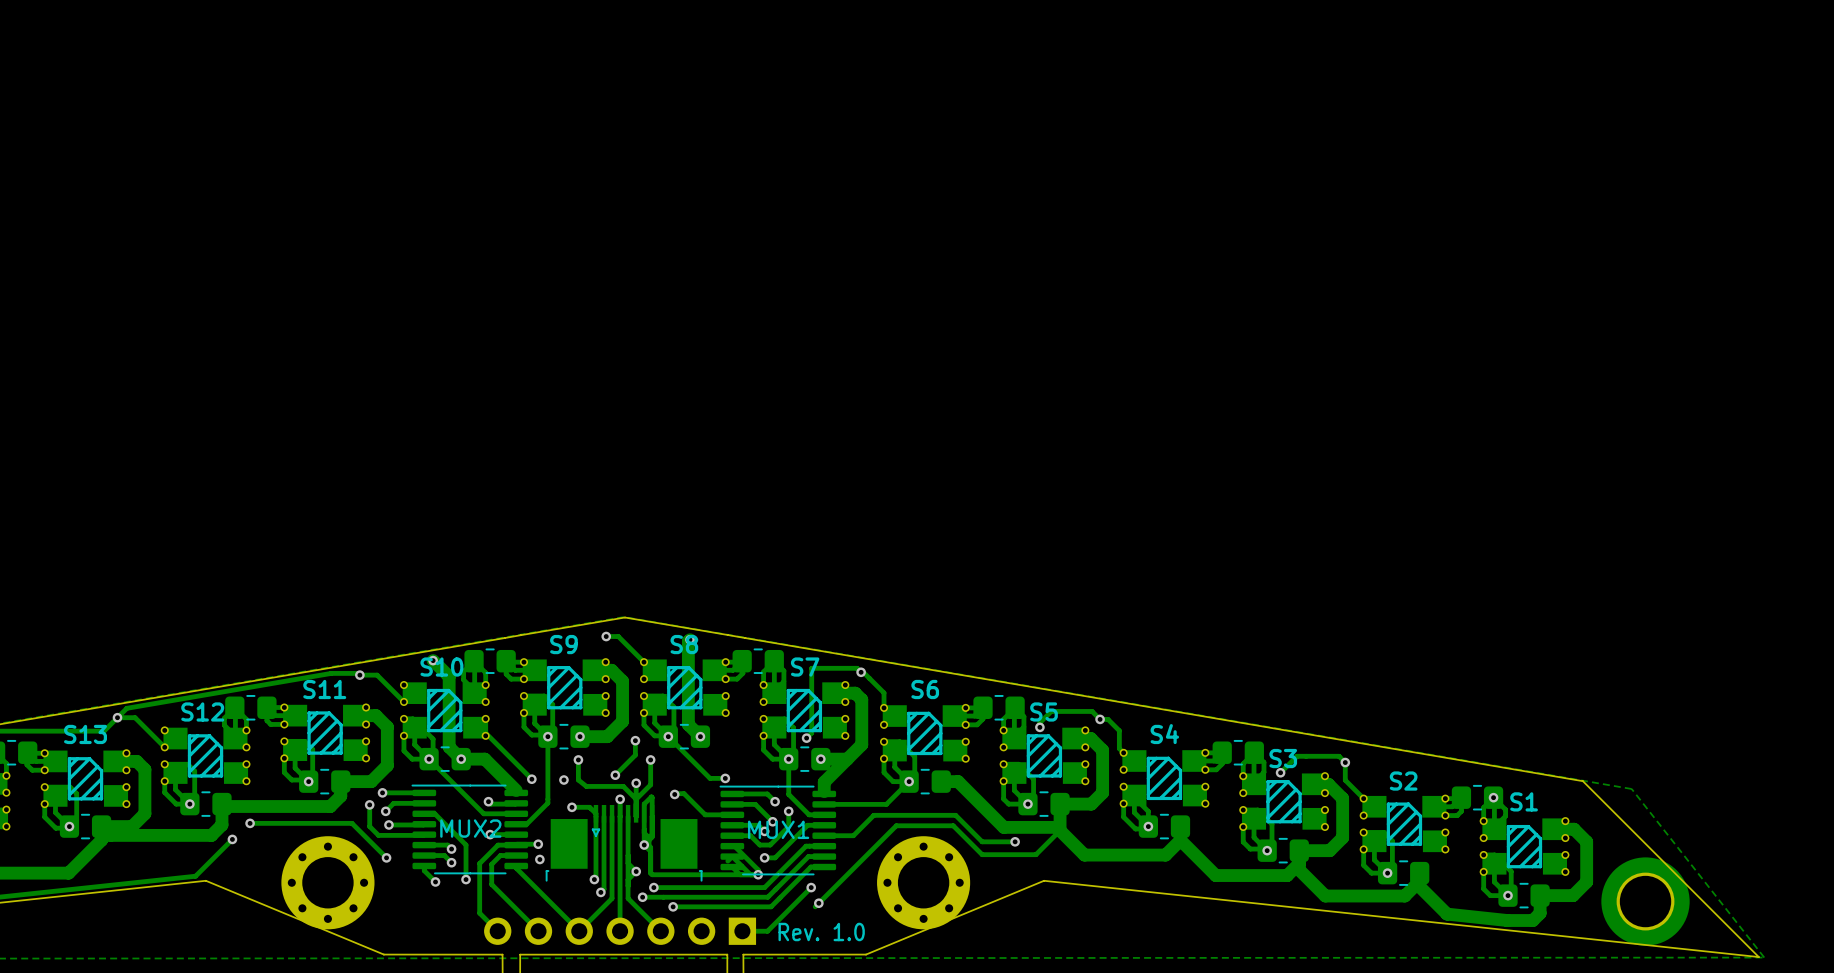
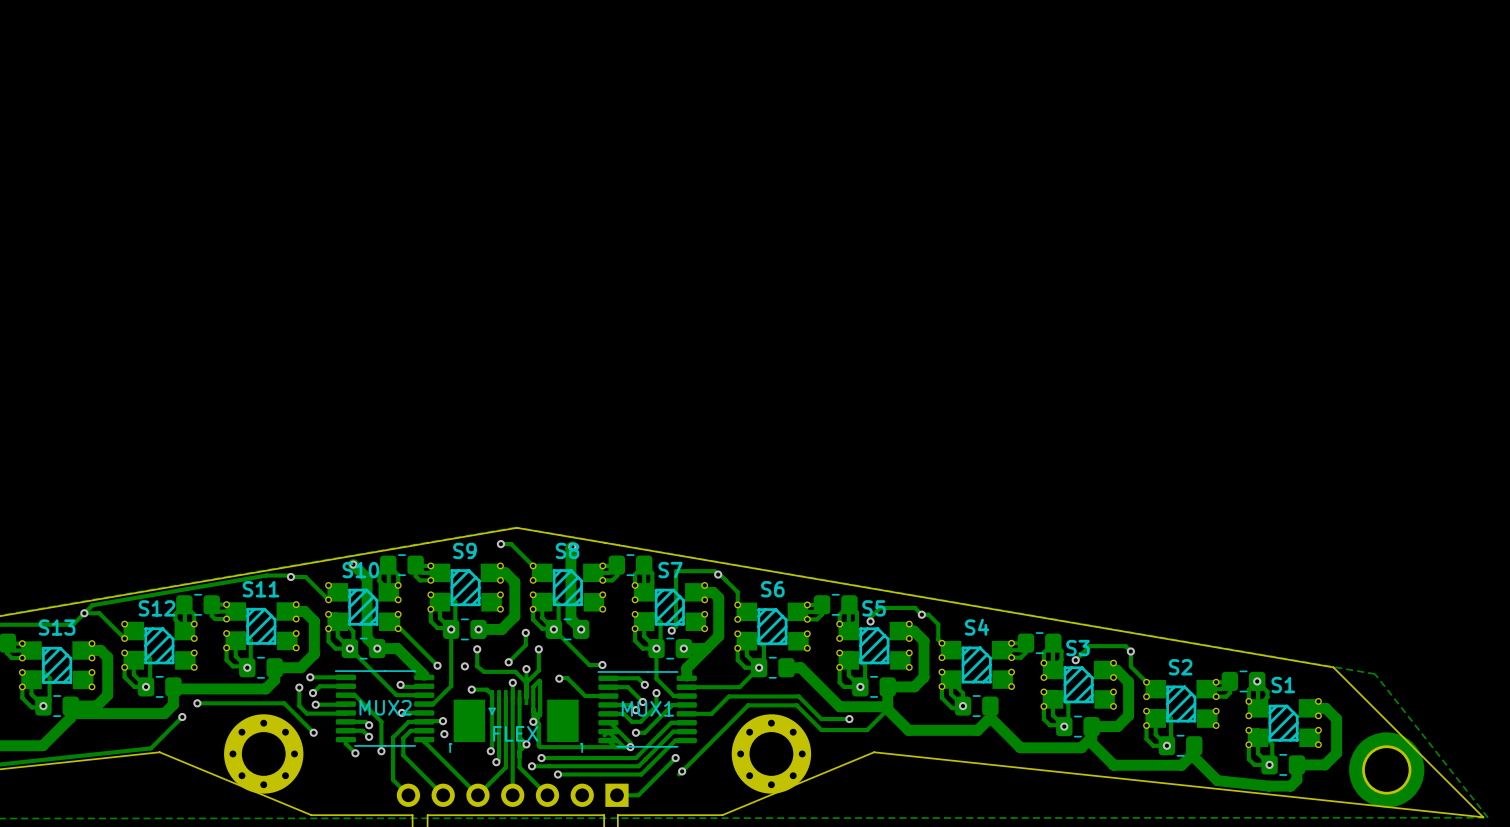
part: (624, 843) -> none
FLEX: none -> (516, 721)
text: Rev. 1.0 (821, 932) -> none

